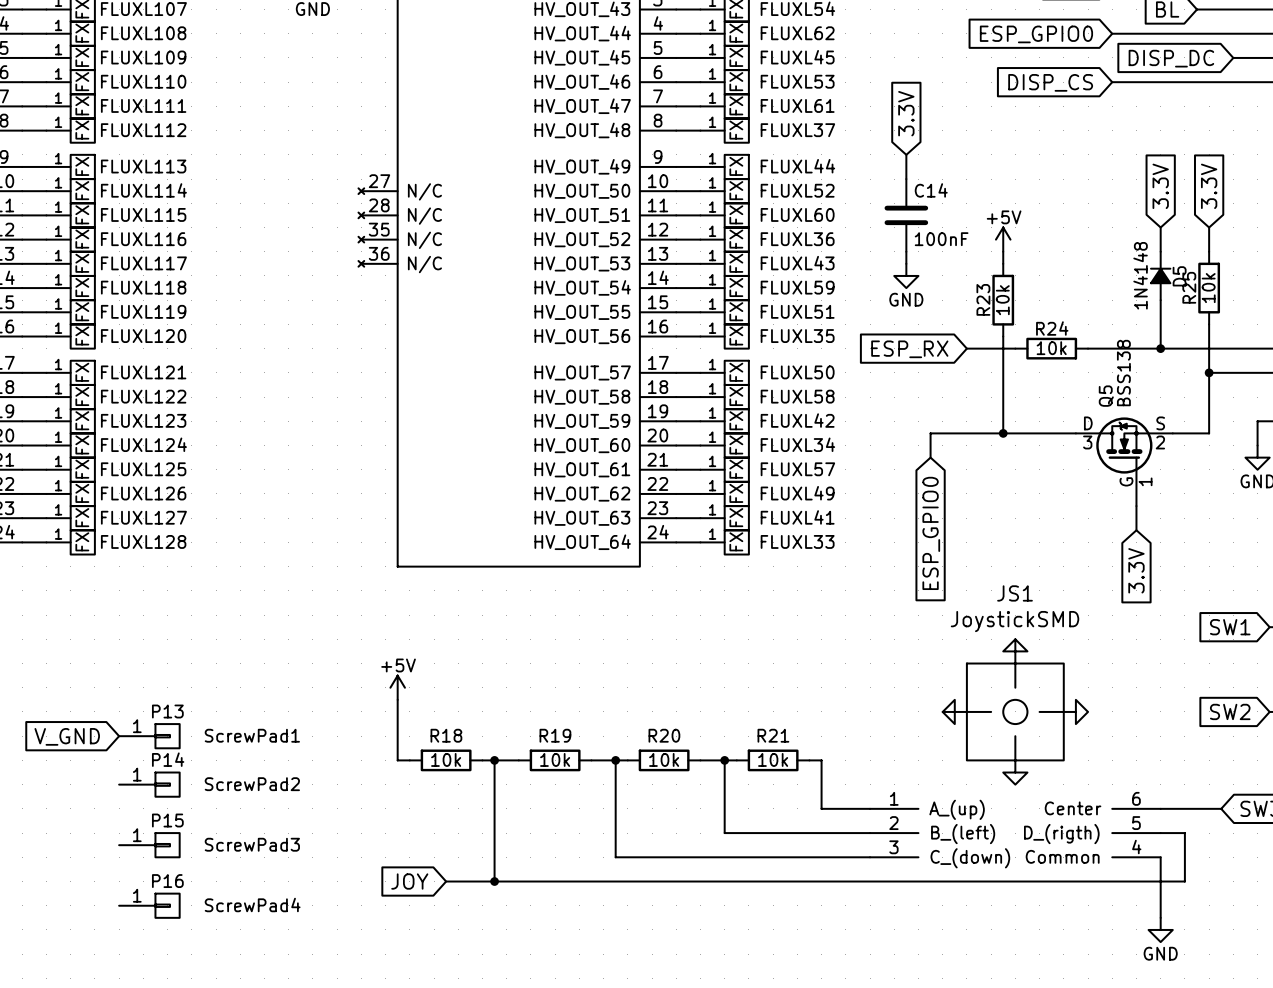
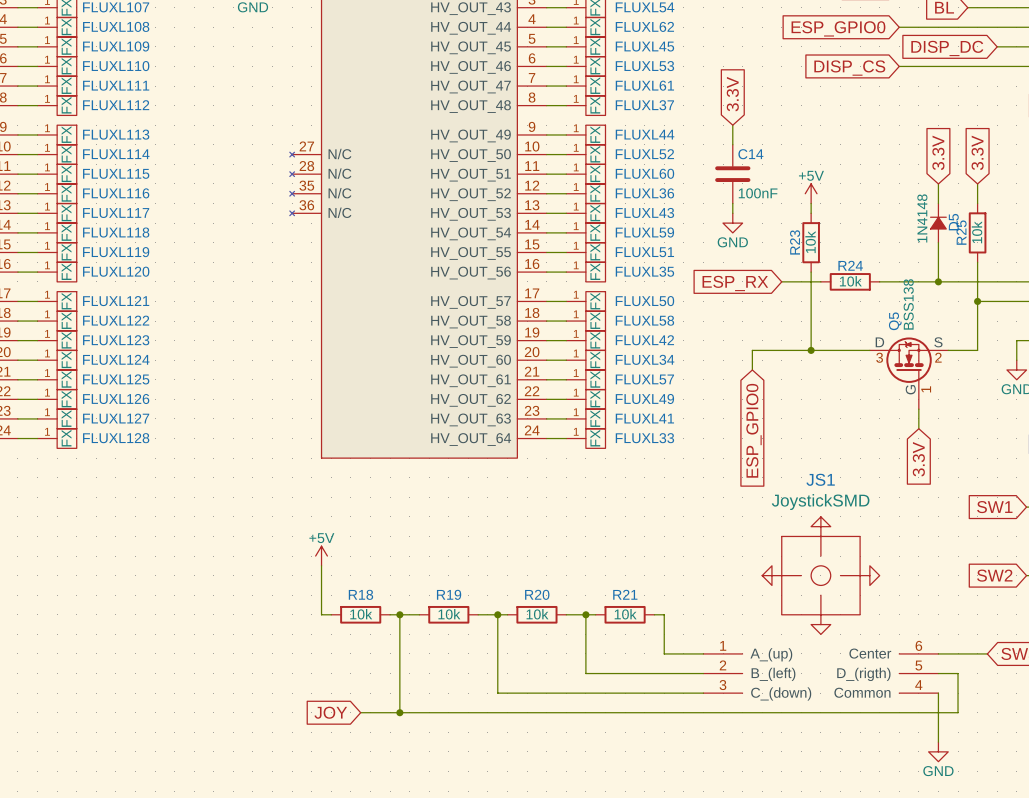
global label: V_GND (67, 736) -> none
P13: ScrewPad1 (149, 736) -> none
P14: ScrewPad2 (149, 784) -> none
P15: ScrewPad3 (149, 845) -> none
P16: ScrewPad4 (149, 905) -> none

